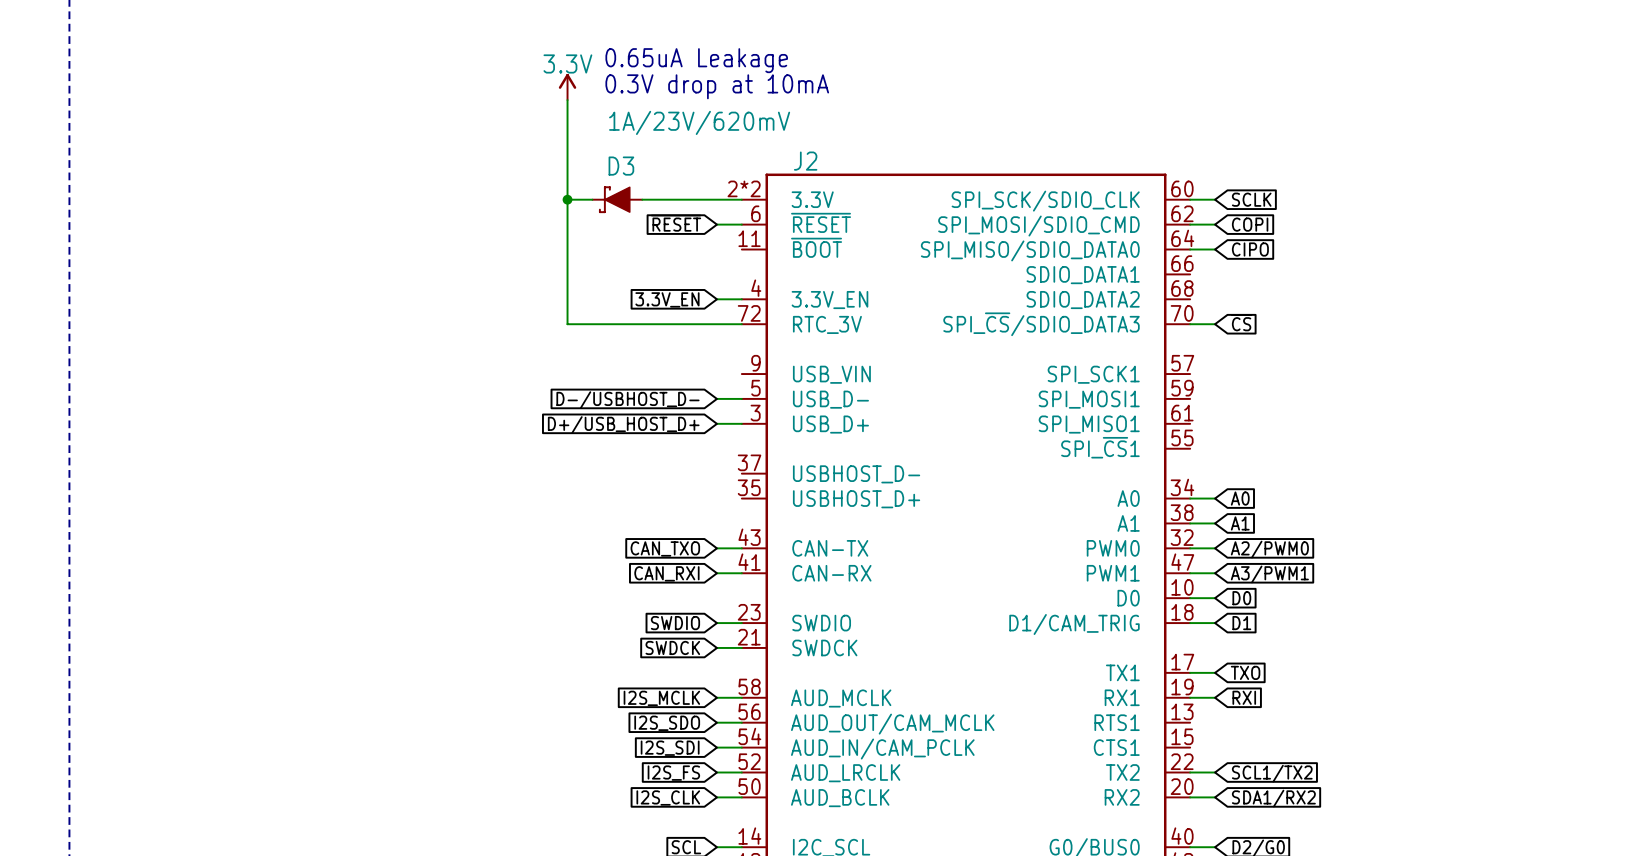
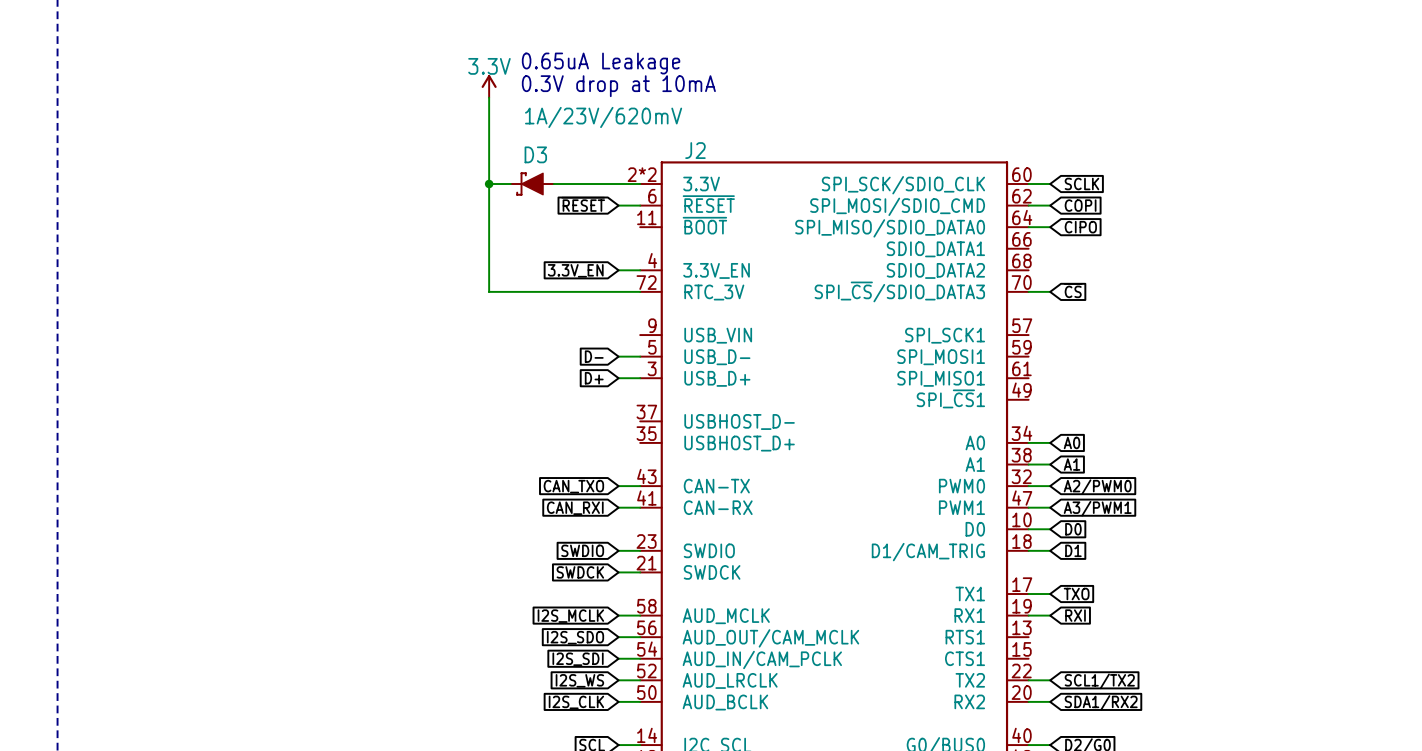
global label: D-/USBHOST_D- (627, 400) -> D- (594, 356)
global label: D+/USB_HOST_D+ (623, 425) -> D+ (594, 378)
J2 pin number: 55 (1182, 437) -> 49 (1021, 390)
global label: I2S_FS (673, 773) -> I2S_WS (579, 680)

